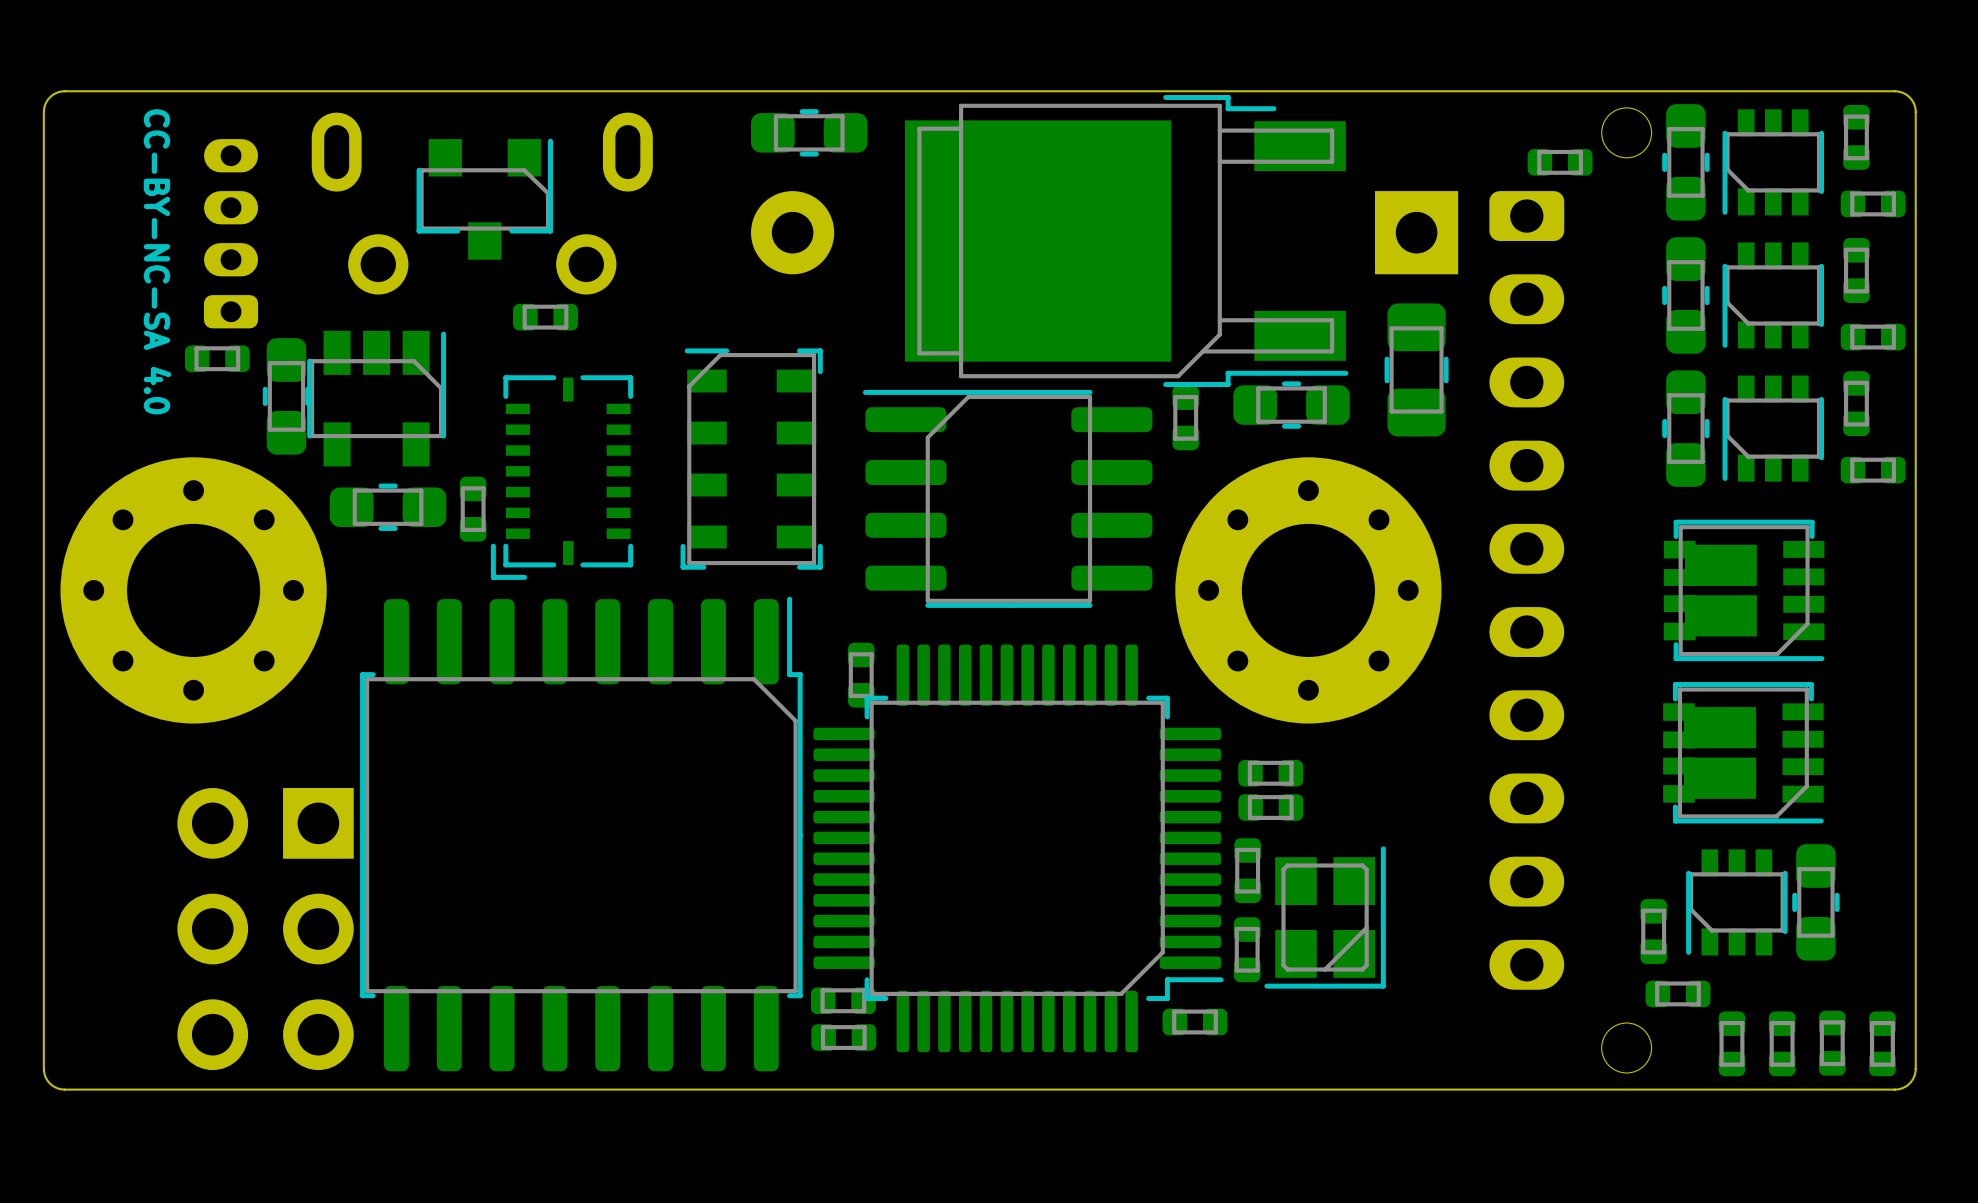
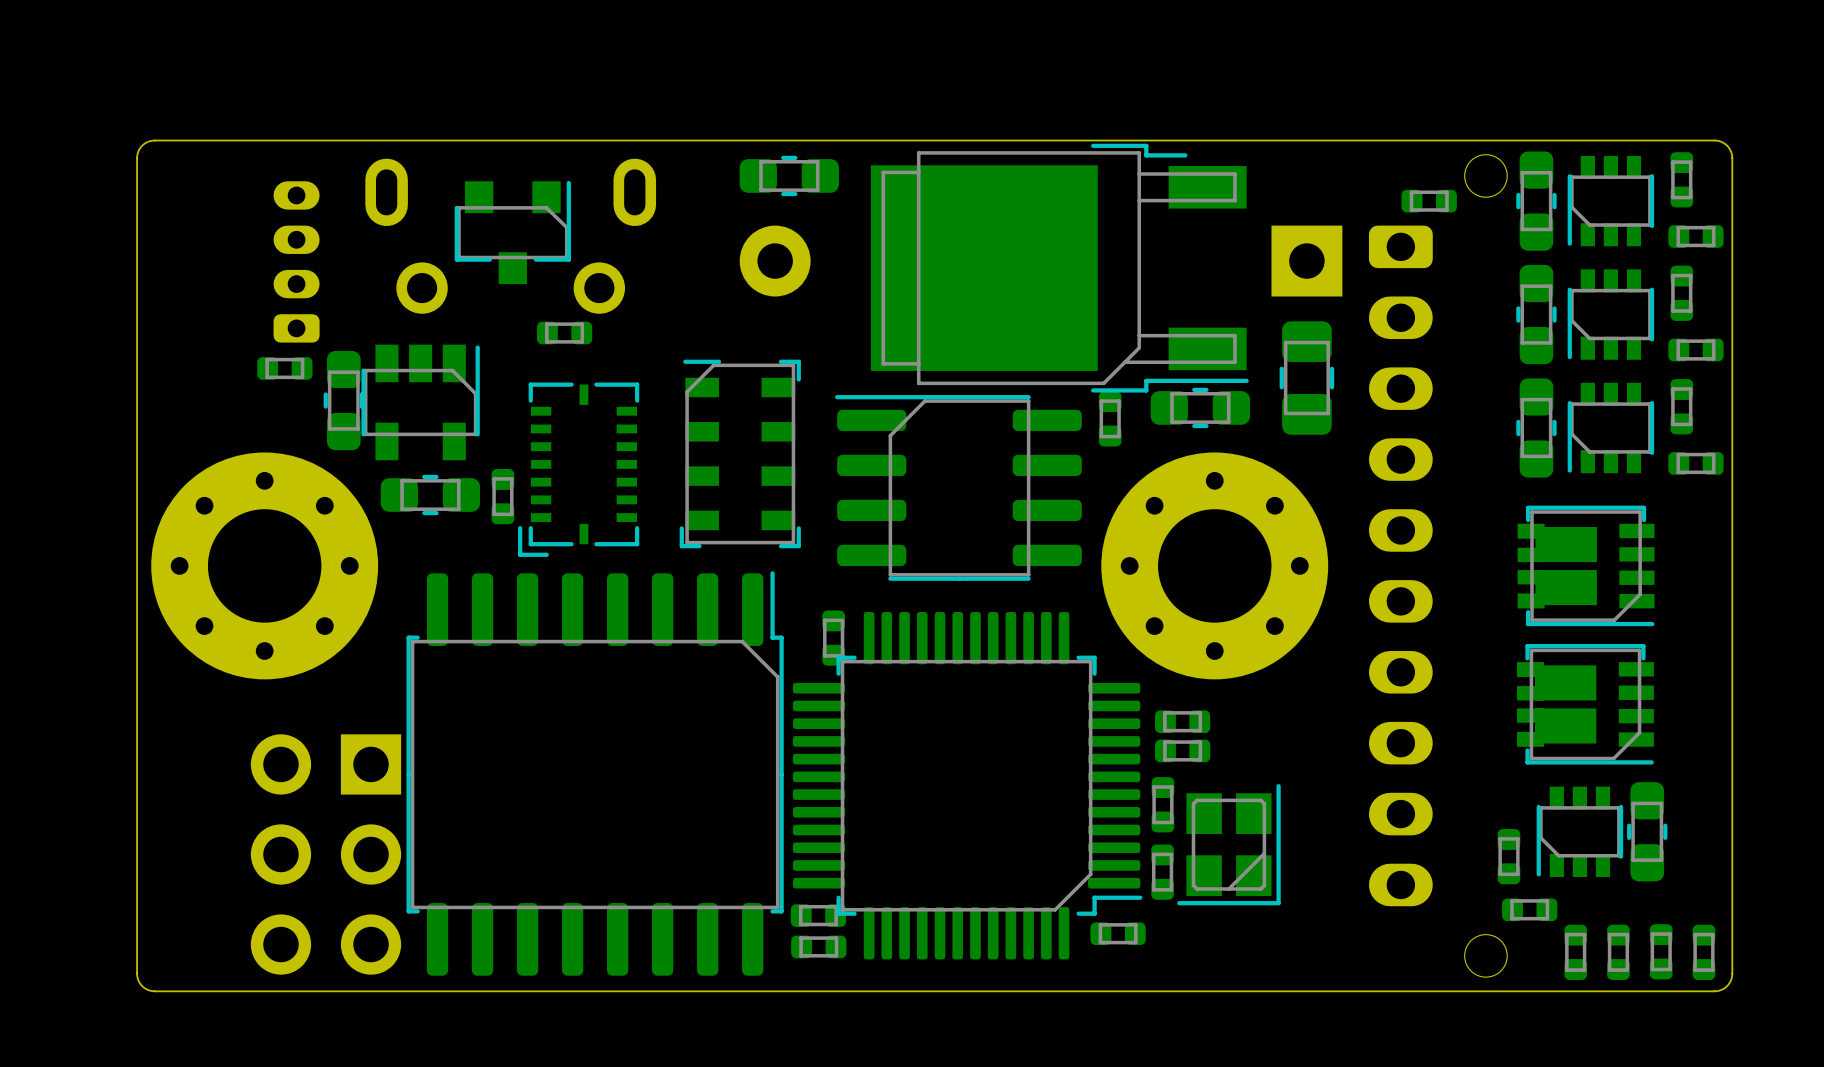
text: CC-BY-NC-SA 4.0 (157, 261) -> none

